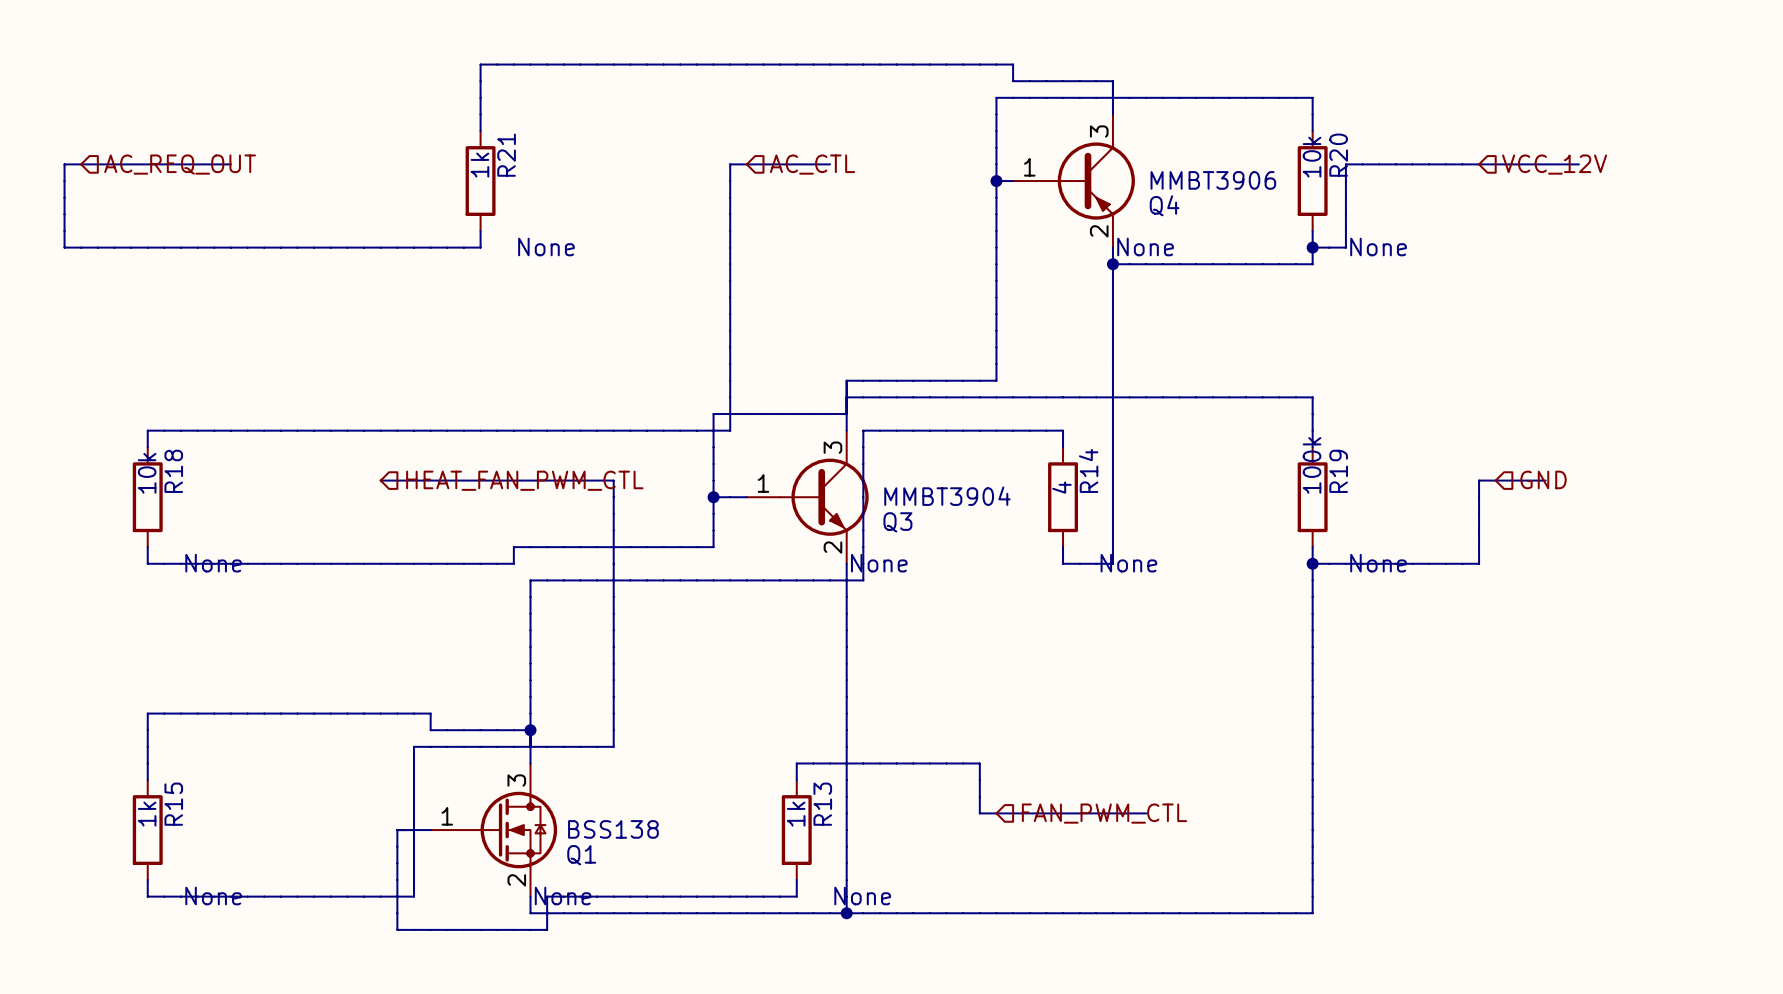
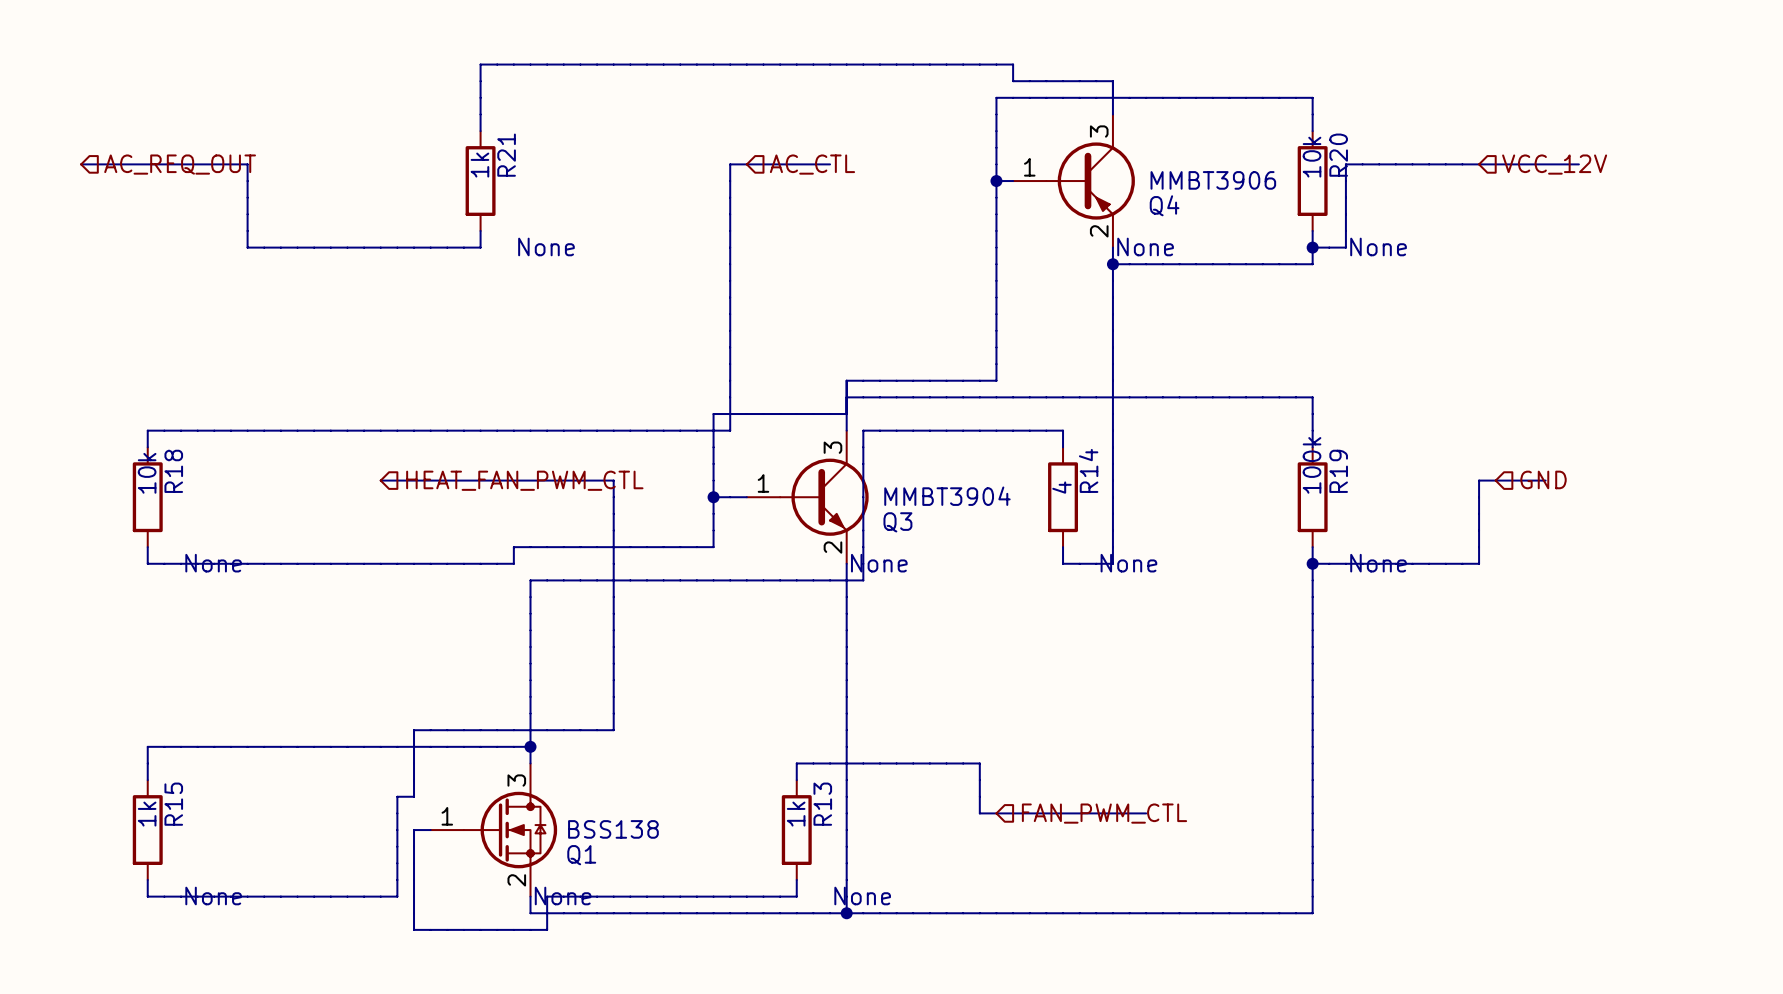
wire: (81, 164) (64, 164) (64, 247) (247, 247) -> (230, 164) (247, 164) (247, 247)
wire: (430, 730) (430, 713) (147, 713) (147, 746) -> (430, 730) (414, 730) (414, 746) (147, 746)
junction position: (530, 730) -> (530, 746)
wire: (613, 730) (613, 746) (530, 746) -> (613, 730) (530, 730)
wire: (414, 796) (414, 830) (397, 830) -> (414, 796) (397, 796) (397, 830)
wire: (414, 896) (397, 896) (397, 929) (414, 929) -> (414, 896) (414, 929)

